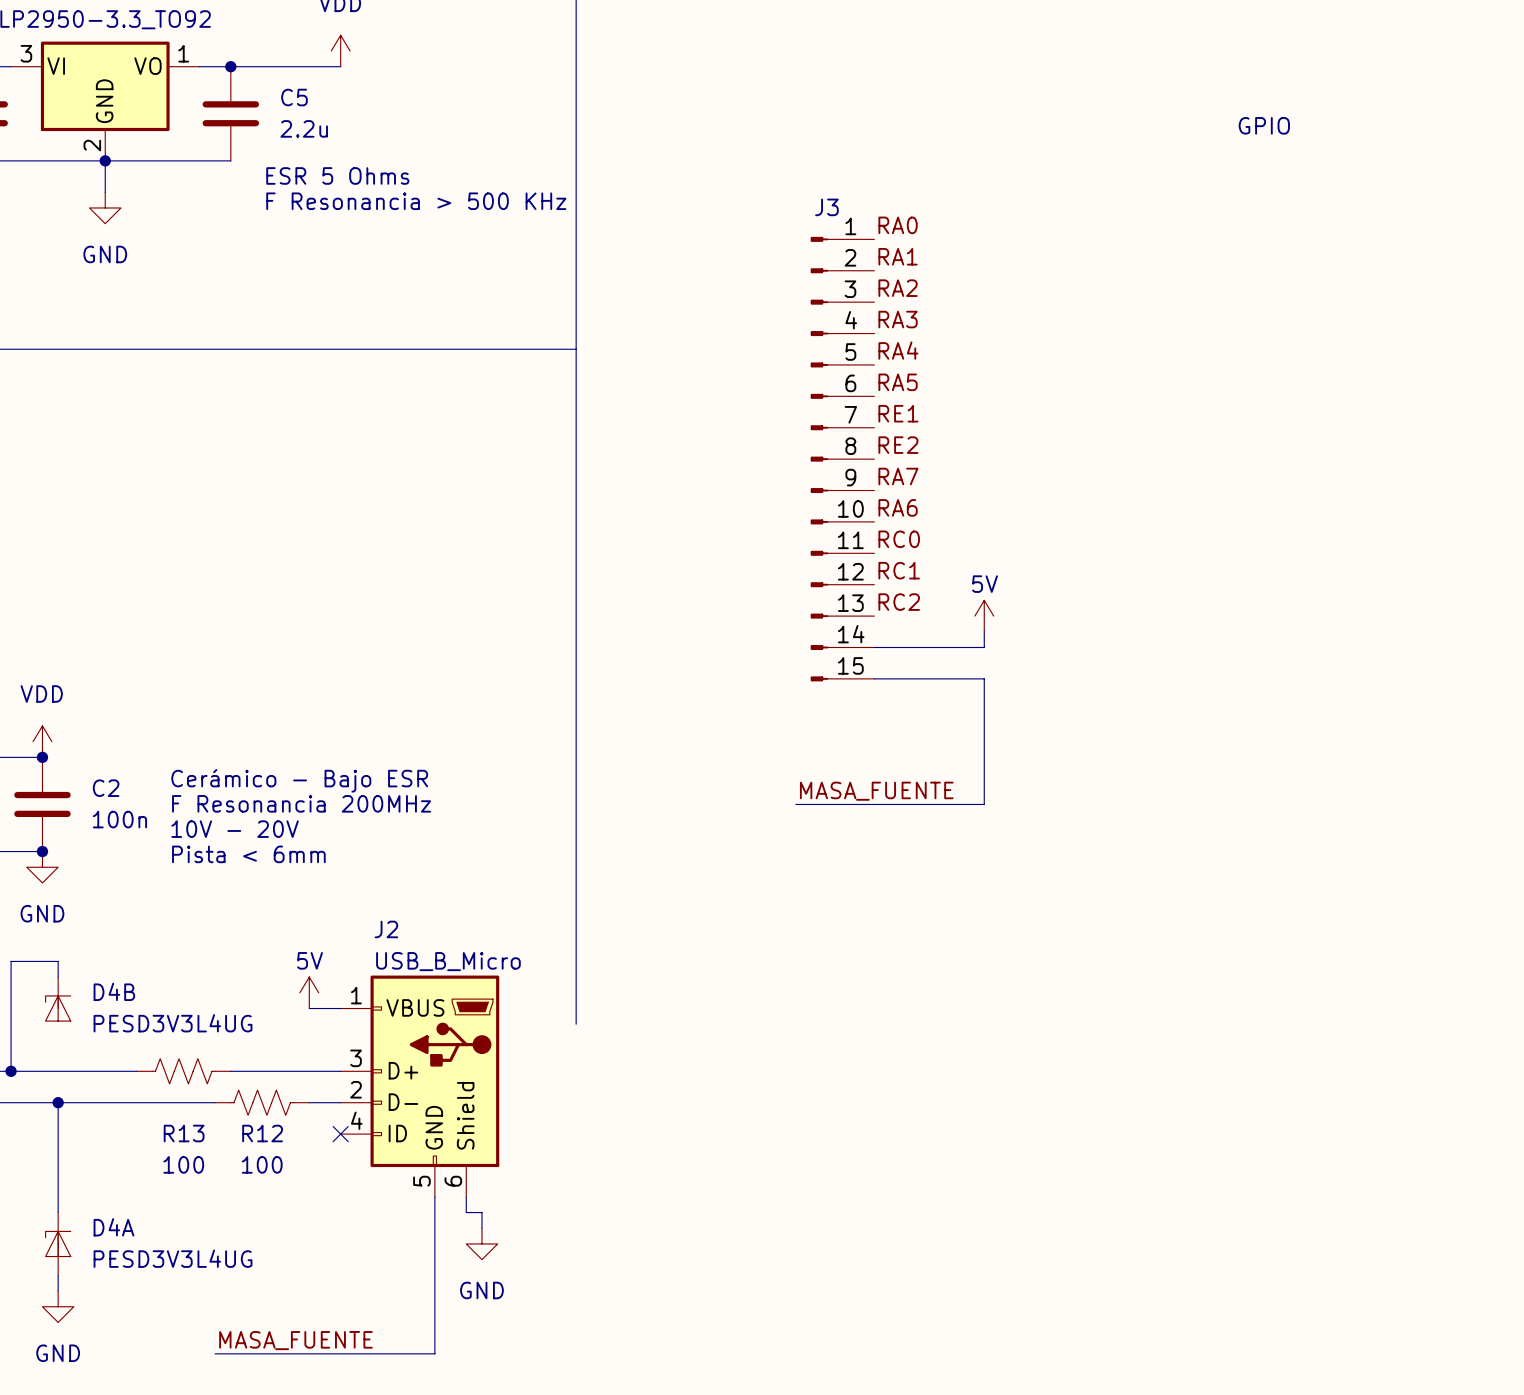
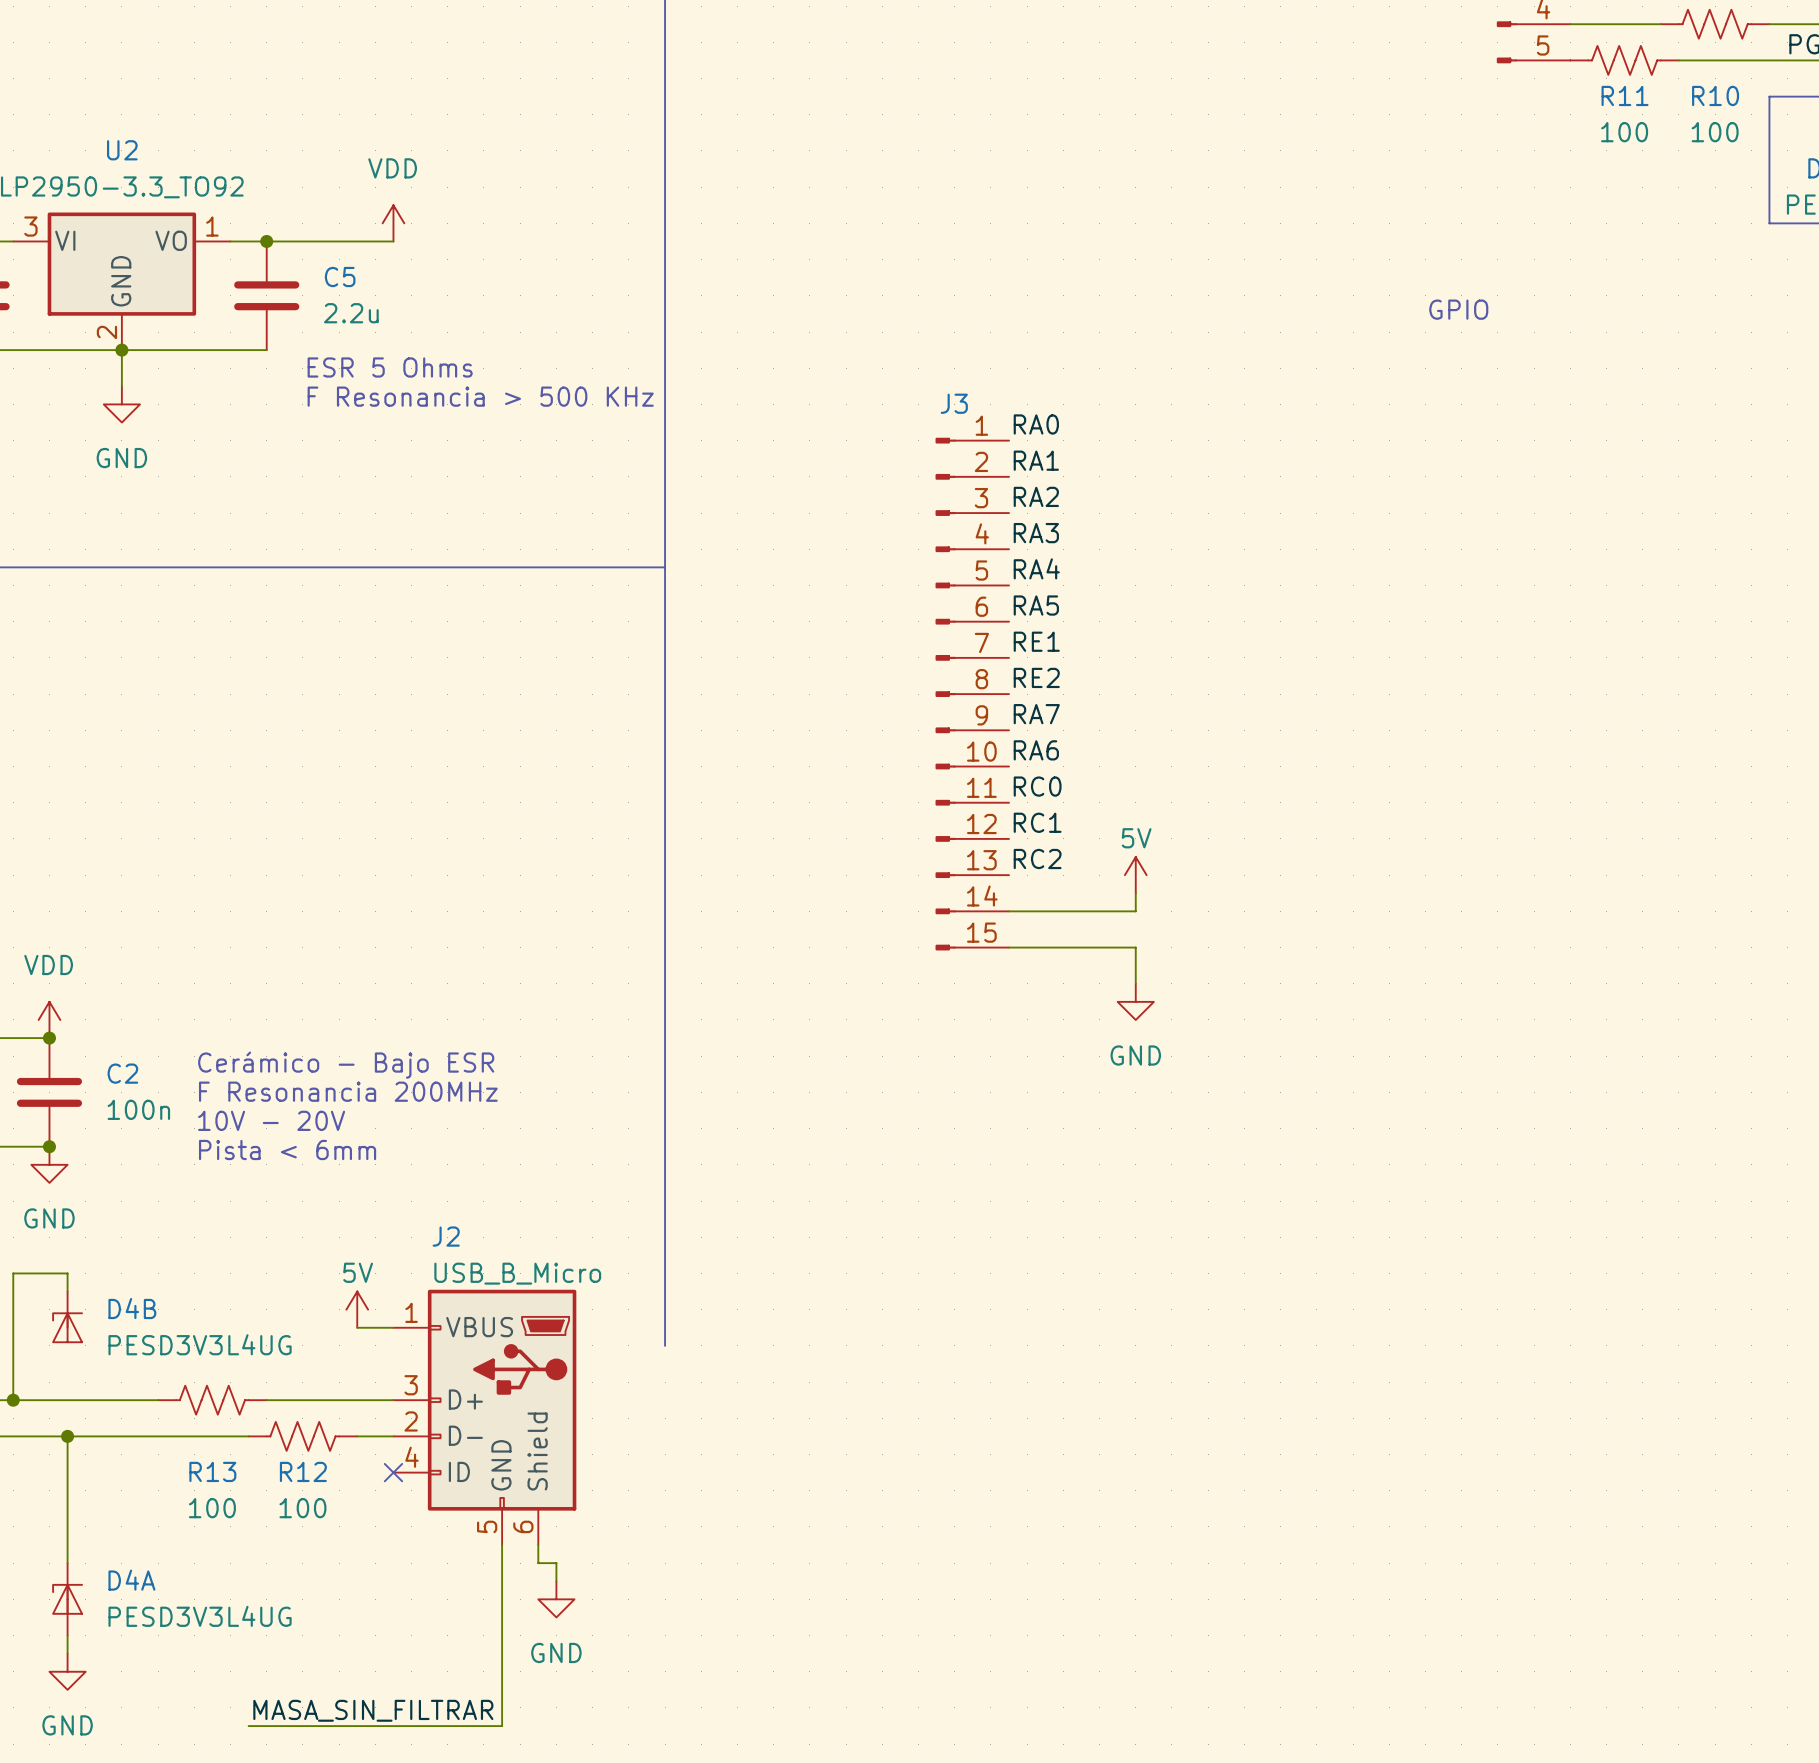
wire: (984, 710) (984, 804) (795, 804) -> none
power symbol: none -> GND (1135, 1001)
label: MASA_FUENTE (876, 791) -> none
label: MASA_FUENTE (295, 1340) -> MASA_SIN_FILTRAR (373, 1710)

